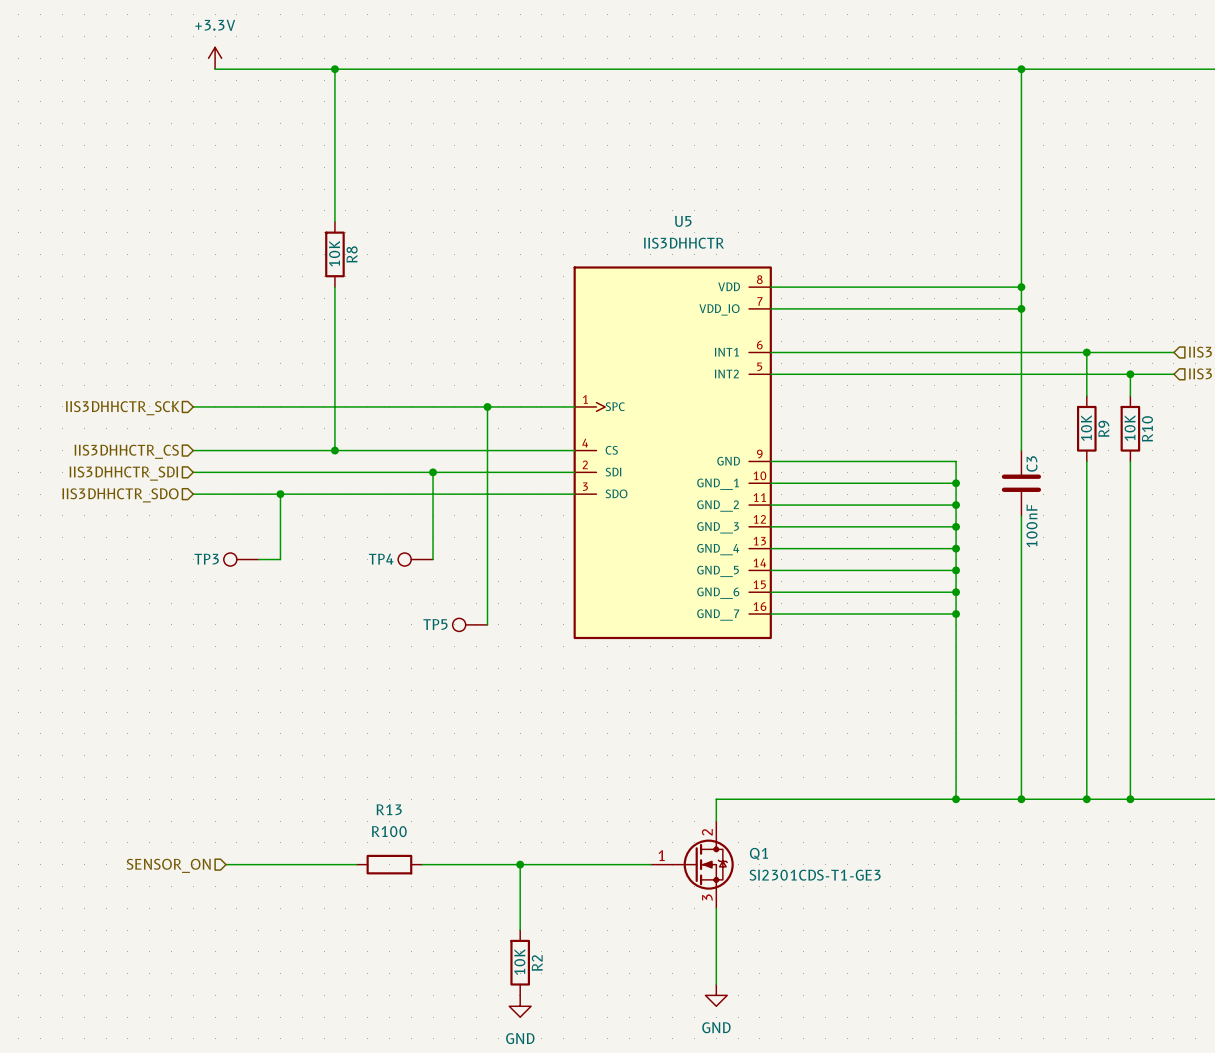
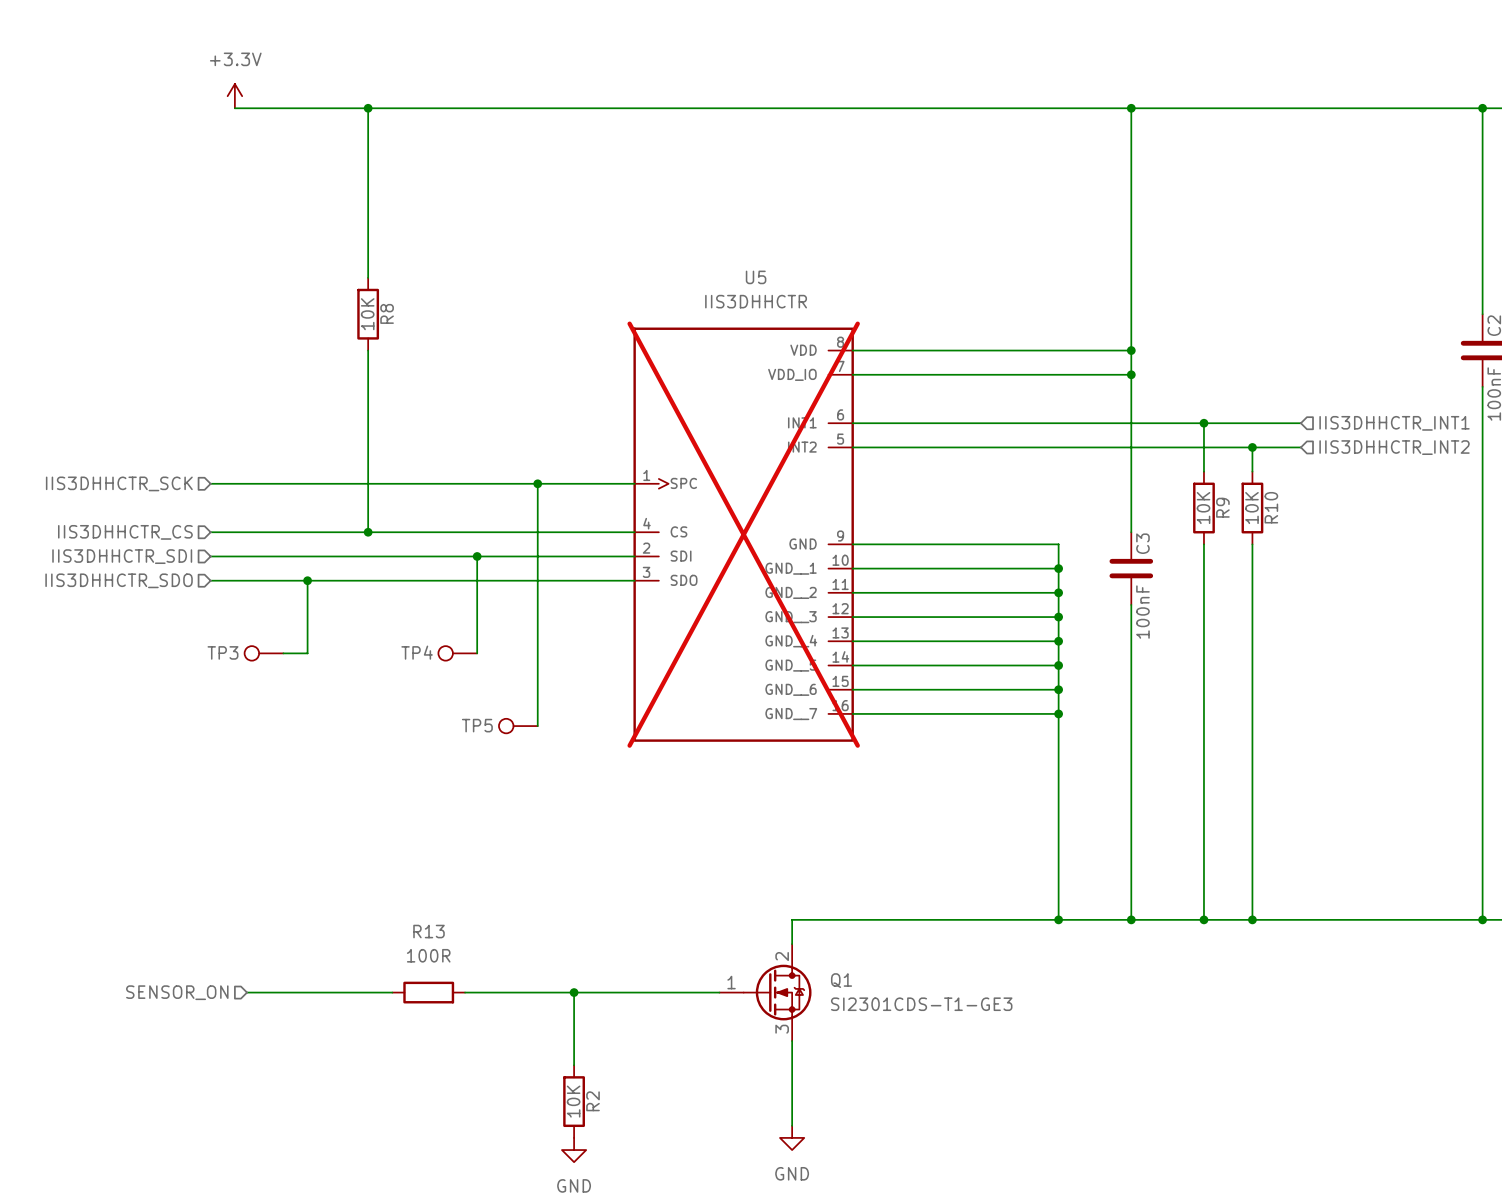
U5 do-not-place cross: none -> (743, 534)
R13 value: R100 (389, 831) -> 100R (428, 955)

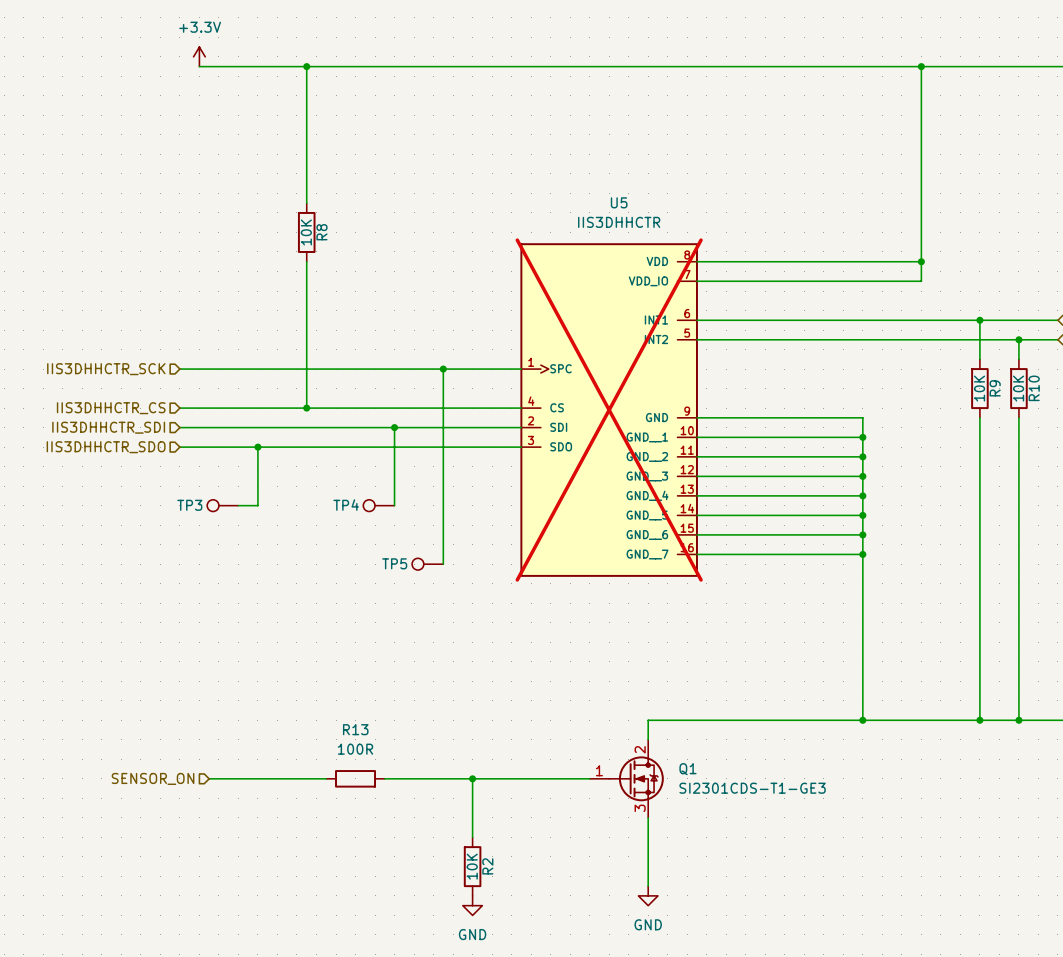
wire: (1131, 374) (1131, 532) -> none
junction: (1131, 374) -> none
C3: 100nF (1131, 568) -> none
wire: (1131, 604) (1131, 919) -> none
junction: (1131, 919) -> none

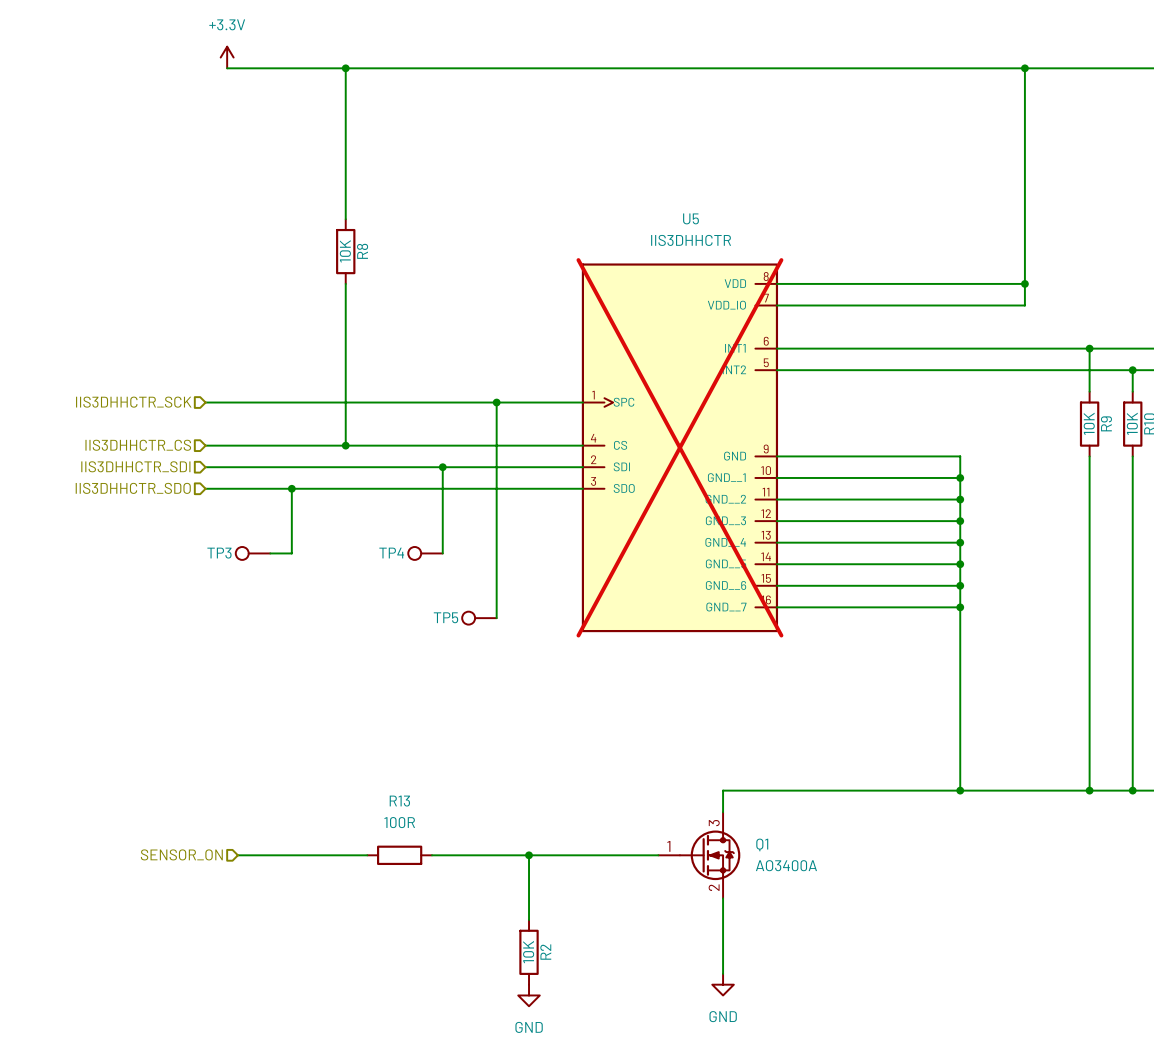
Q1 pin number: 2 (640, 749) -> 3 (714, 823)
Q1 value: SI2301CDS-T1-GE3 (752, 788) -> AO3400A (786, 865)
Q1 pin number: 3 (640, 808) -> 2 (714, 887)

